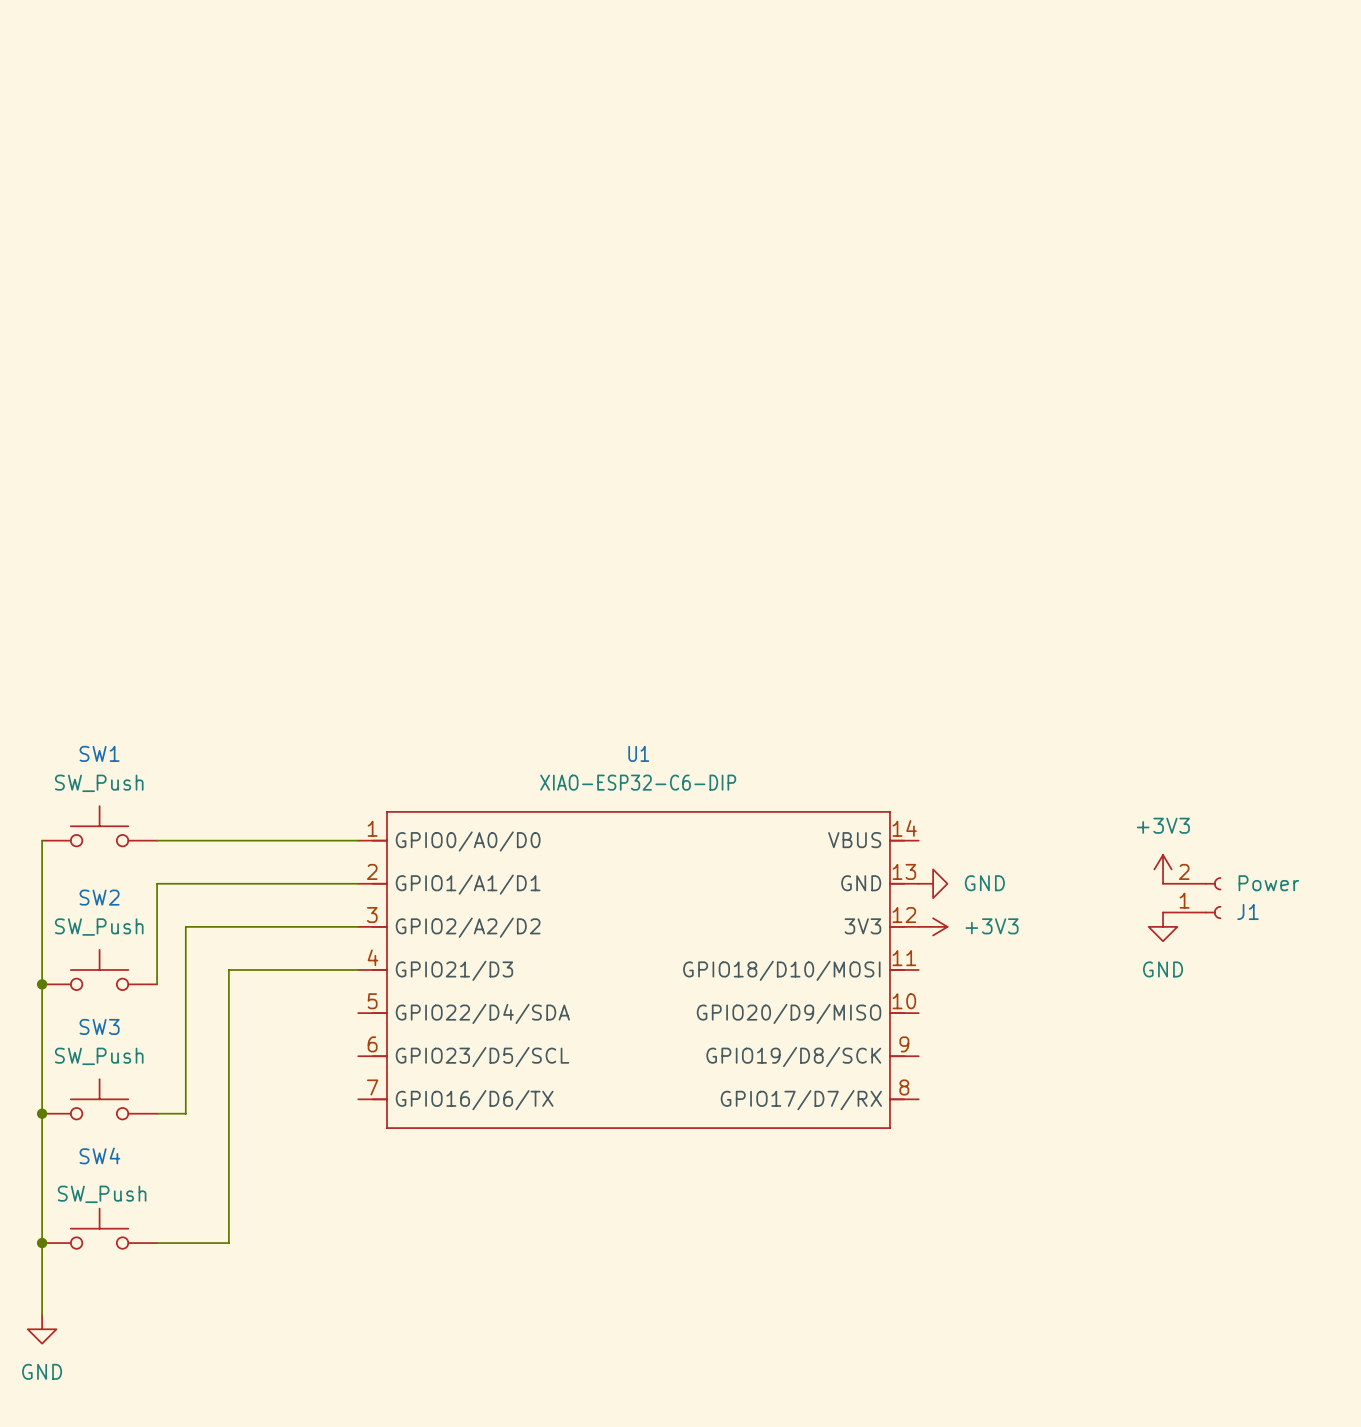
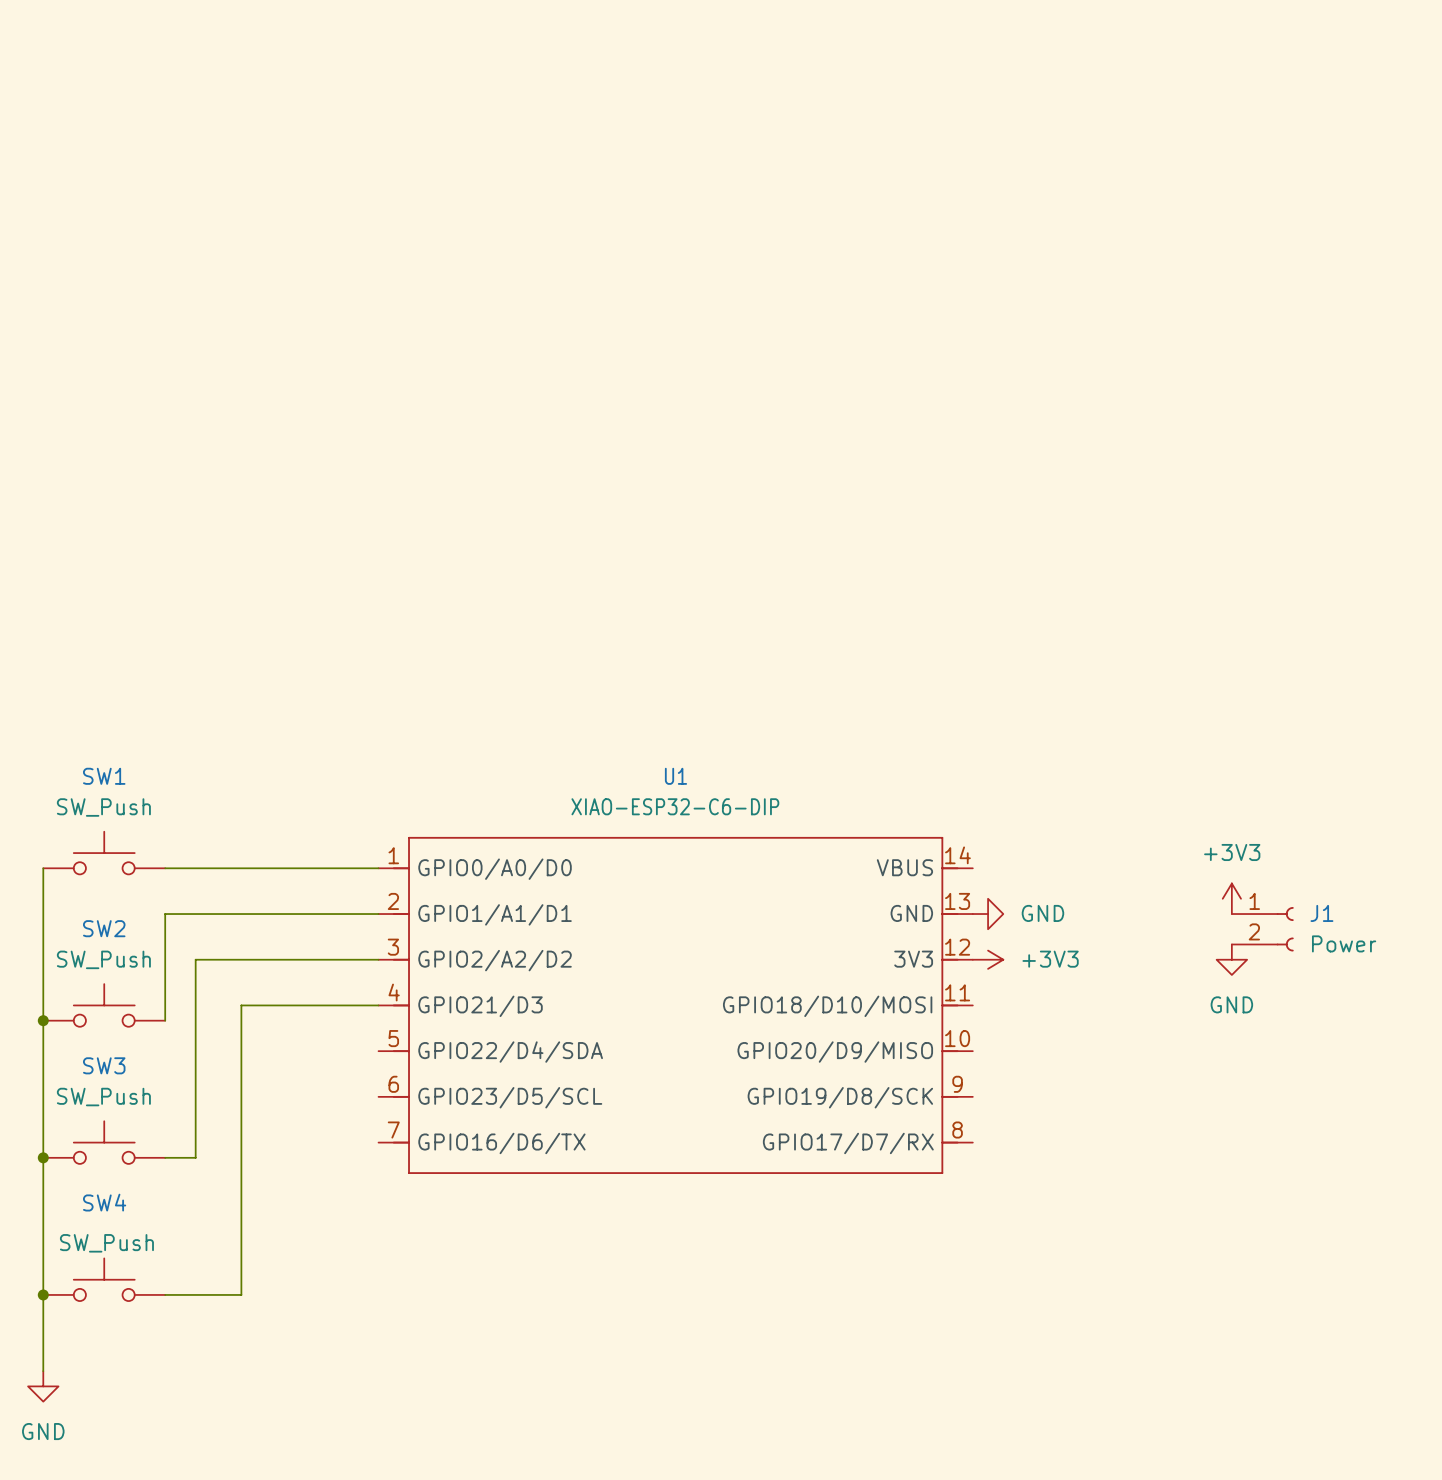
J1 flip: as is (1213, 898) -> up-down (1285, 929)

